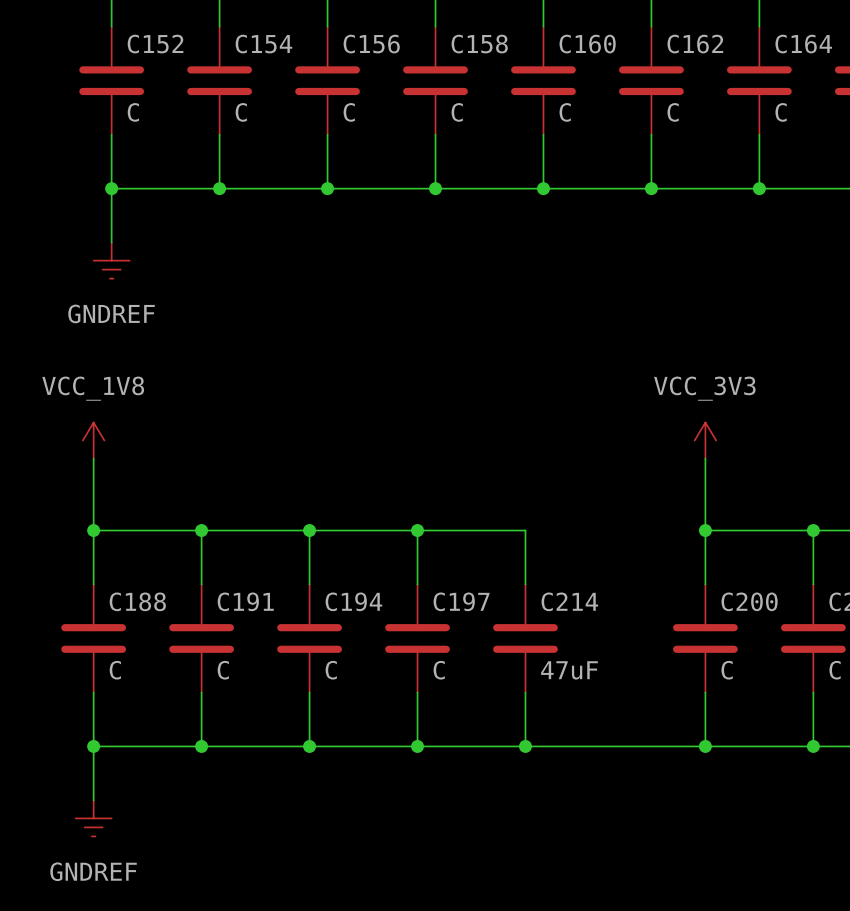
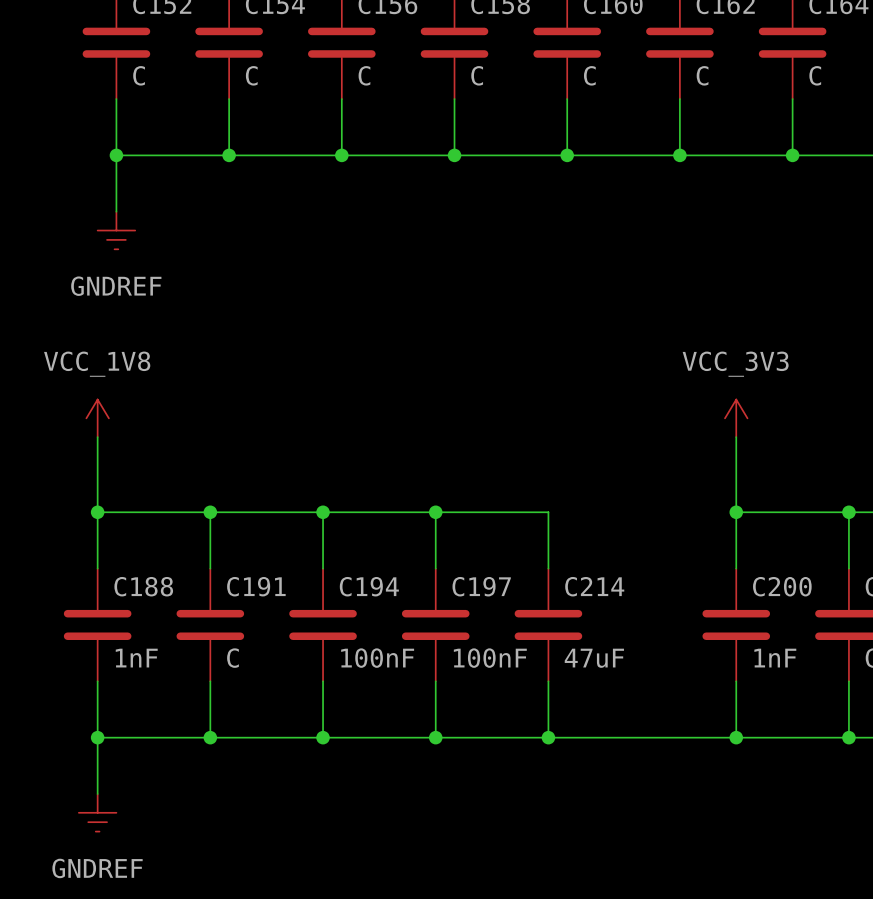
C188 value: C (115, 670) -> 1nF (136, 658)
C194 value: C (331, 670) -> 100nF (377, 658)
C197 value: C (439, 670) -> 100nF (490, 658)
C200 value: C (727, 670) -> 1nF (775, 658)

